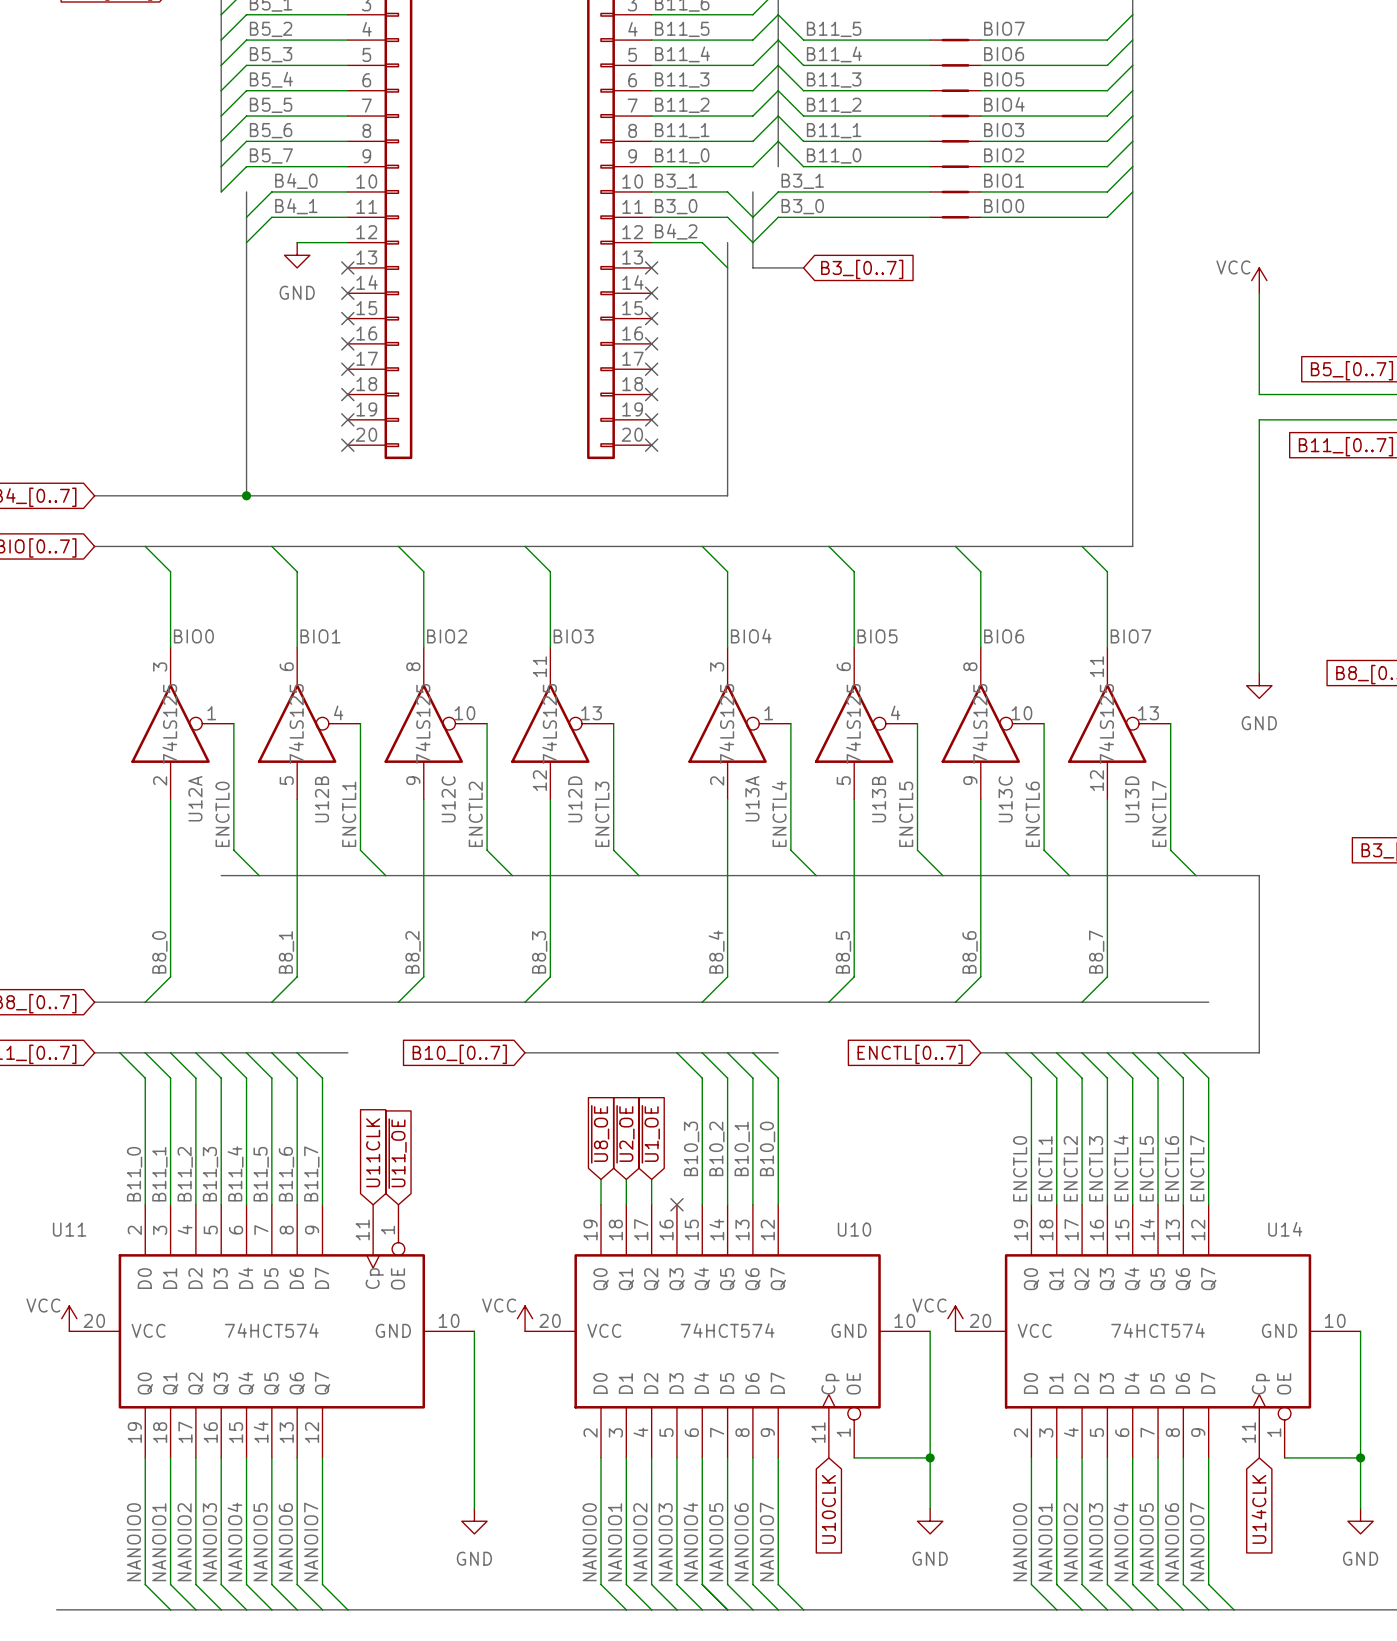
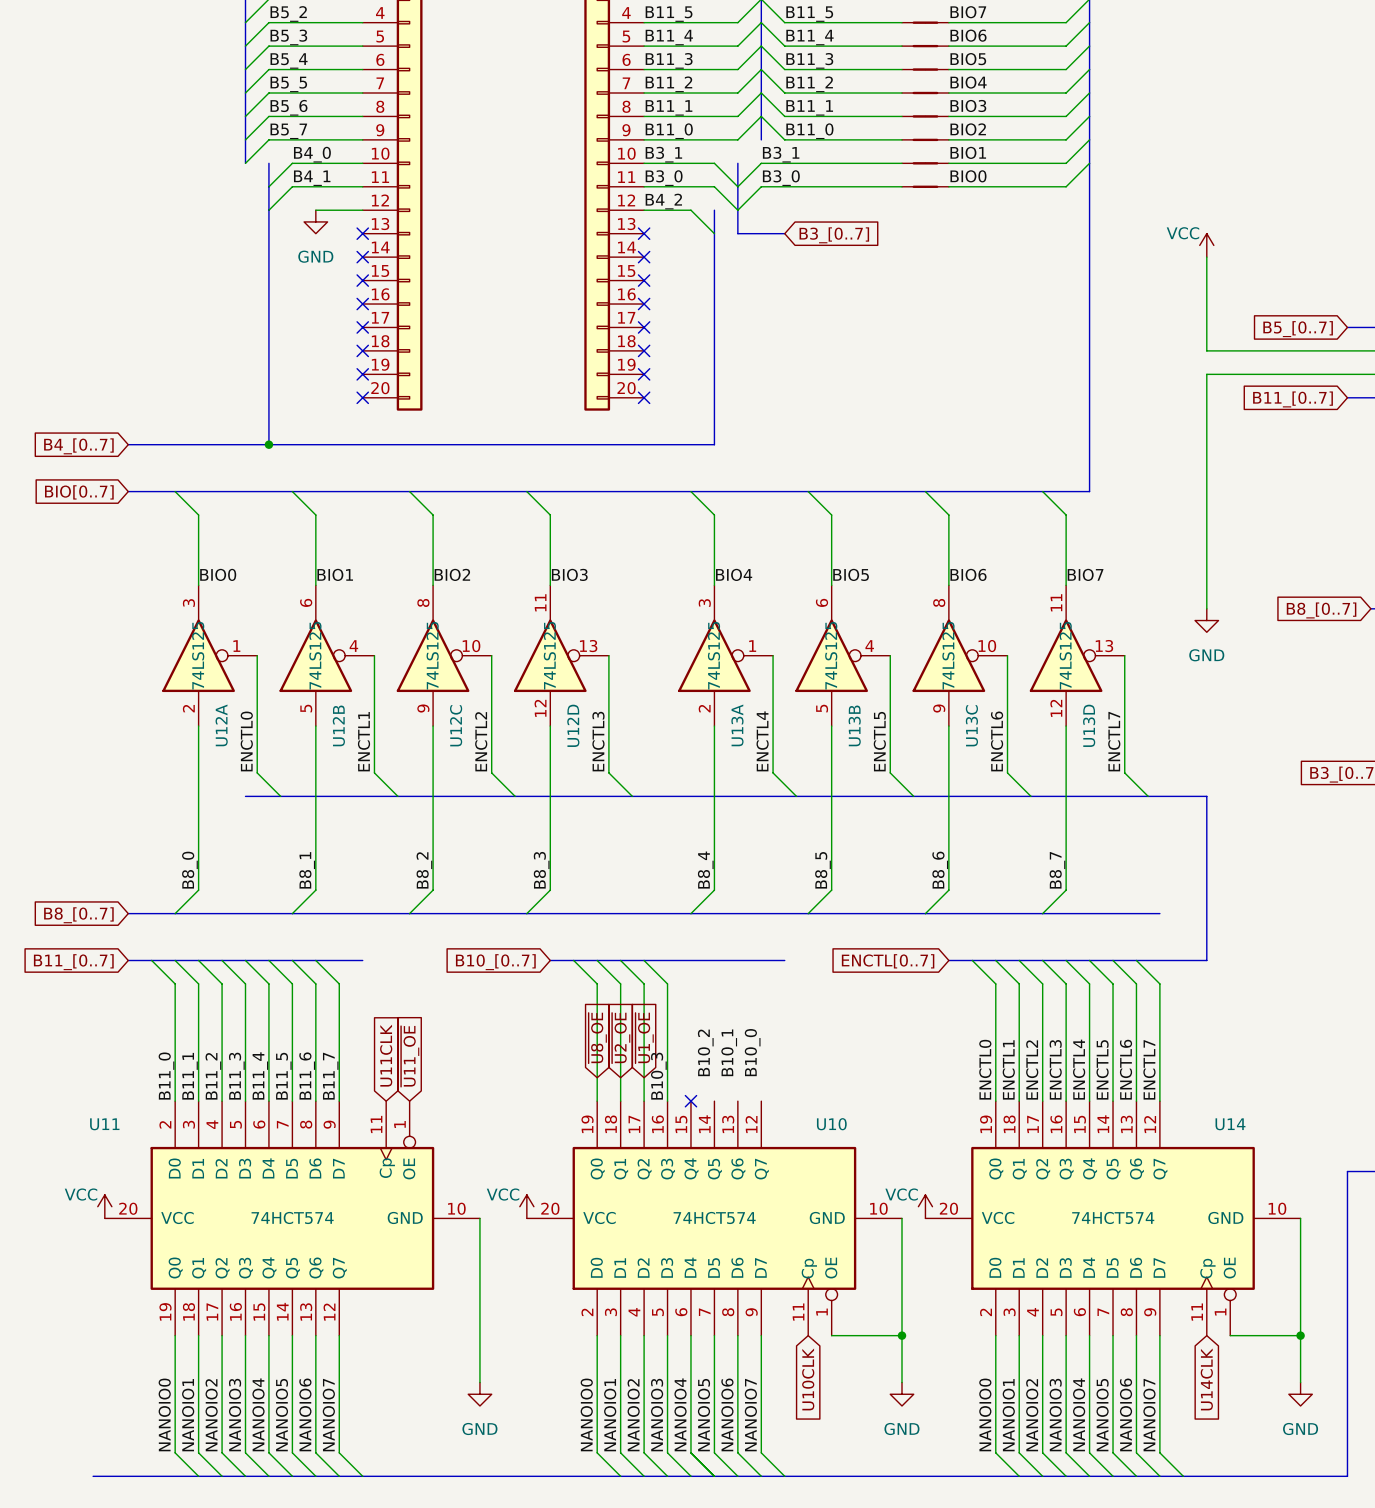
bus: (525, 1052) (550, 1052) -> none
wire: none -> (573, 960) (597, 983) (597, 1077)
wire: none -> (597, 960) (620, 983) (620, 1077)
wire: none -> (620, 960) (644, 983) (644, 1077)
wire: (676, 1052) (702, 1078) (702, 1204) -> (644, 960) (667, 983) (667, 1101)
wire: (702, 1052) (727, 1078) (727, 1204) -> none
wire: (727, 1052) (752, 1078) (752, 1204) -> none
wire: (752, 1052) (778, 1078) (778, 1204) -> none
bus: none -> (761, 960) (784, 960)
global label position: B10_[0..7] (459, 1054) -> B10_[0..7] (495, 962)
label position: B10_3 (691, 1148) -> B10_3 (658, 1076)
no-connect mark position: (676, 1204) -> (690, 1101)

